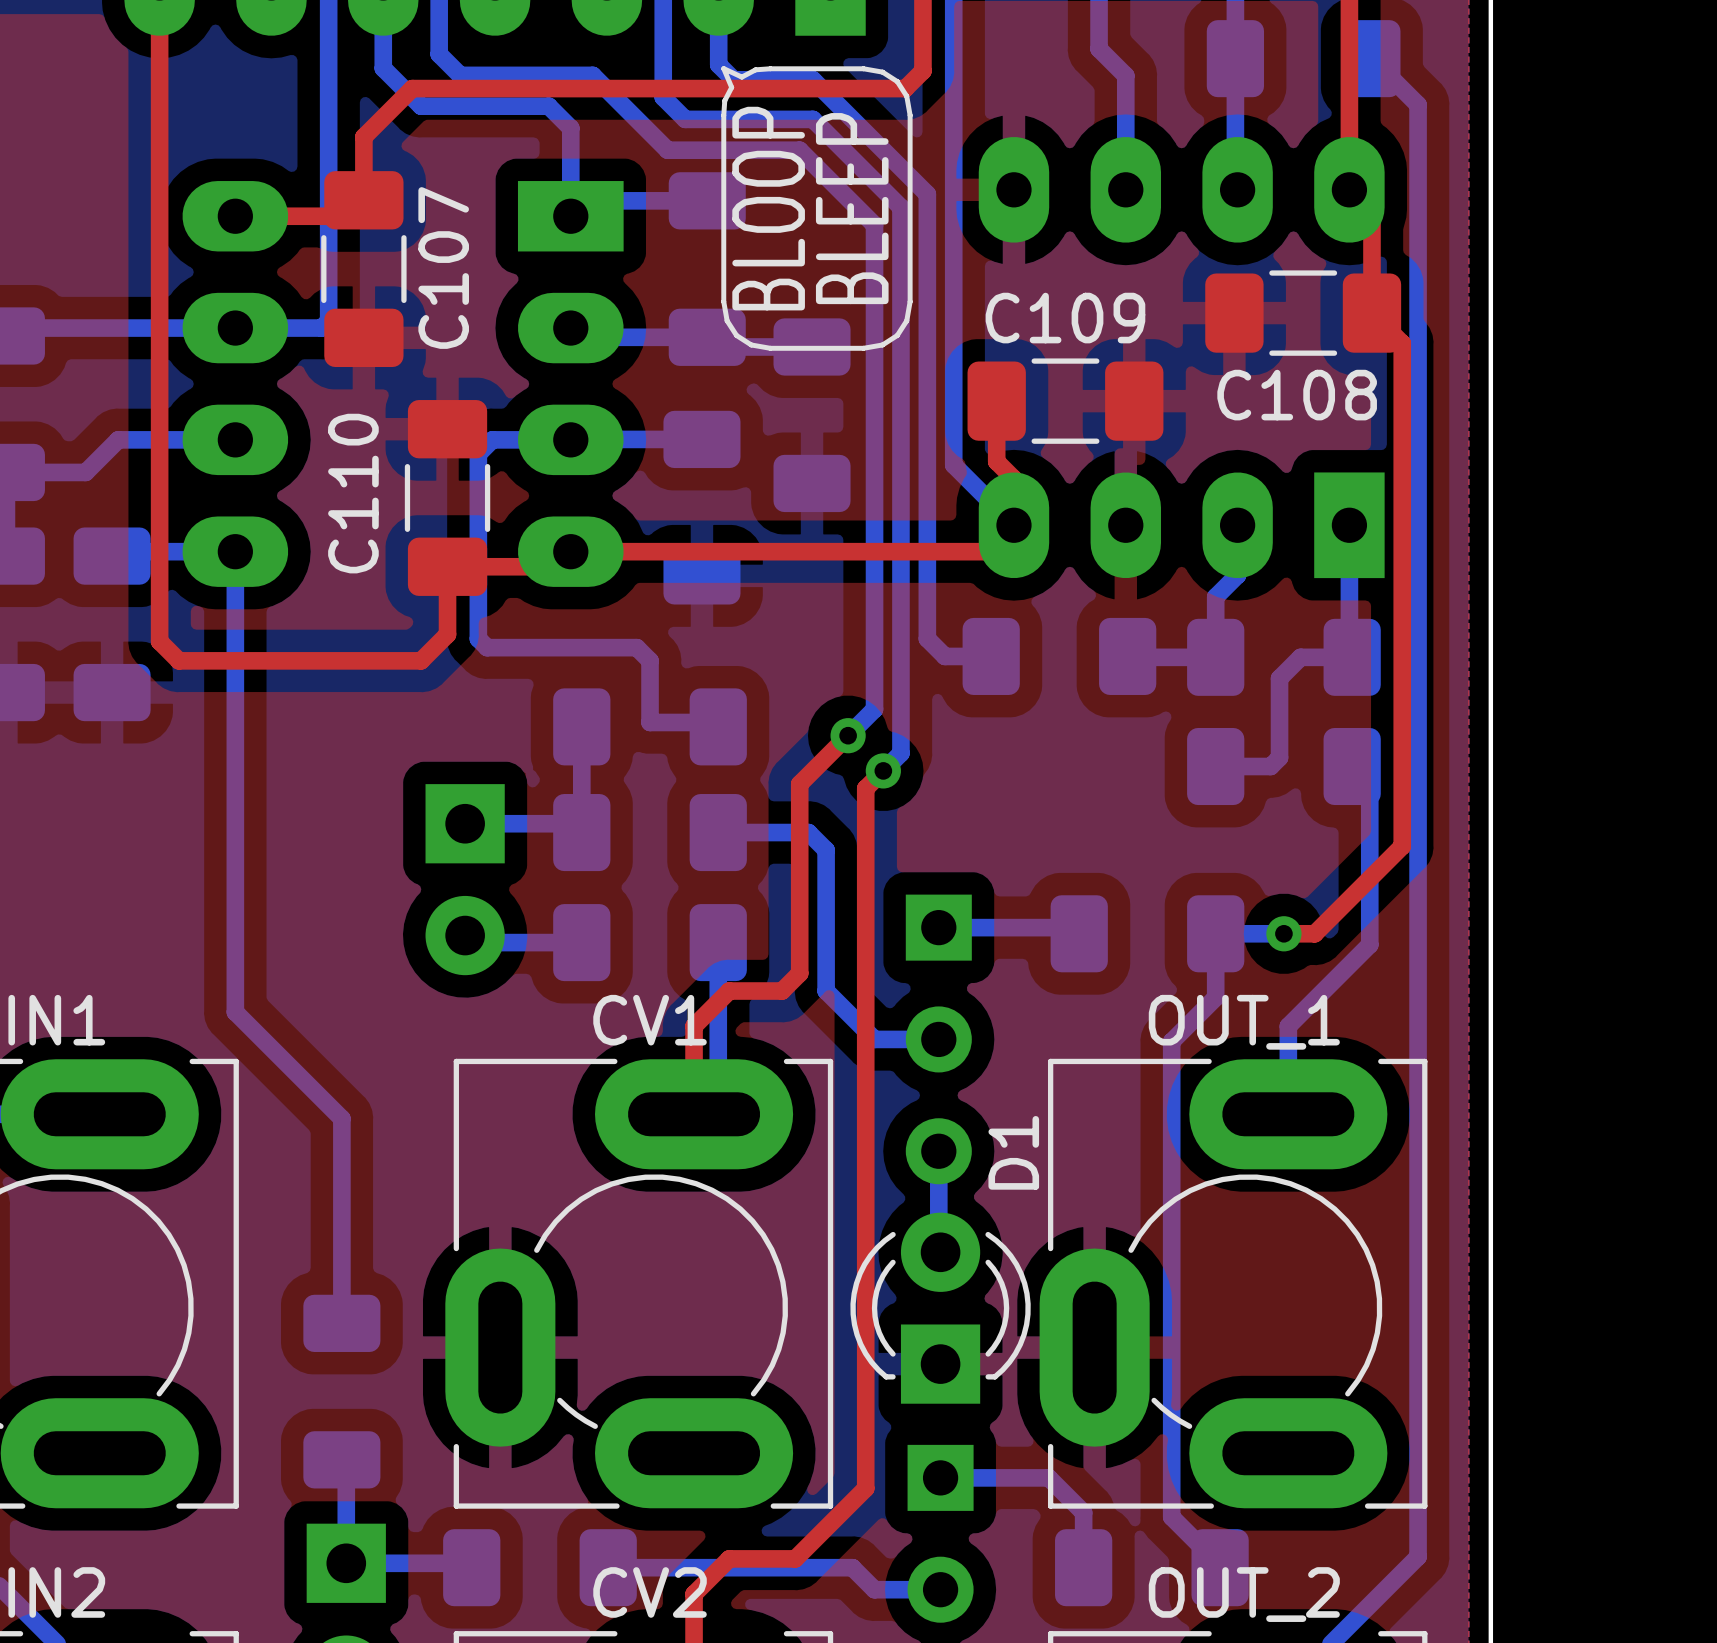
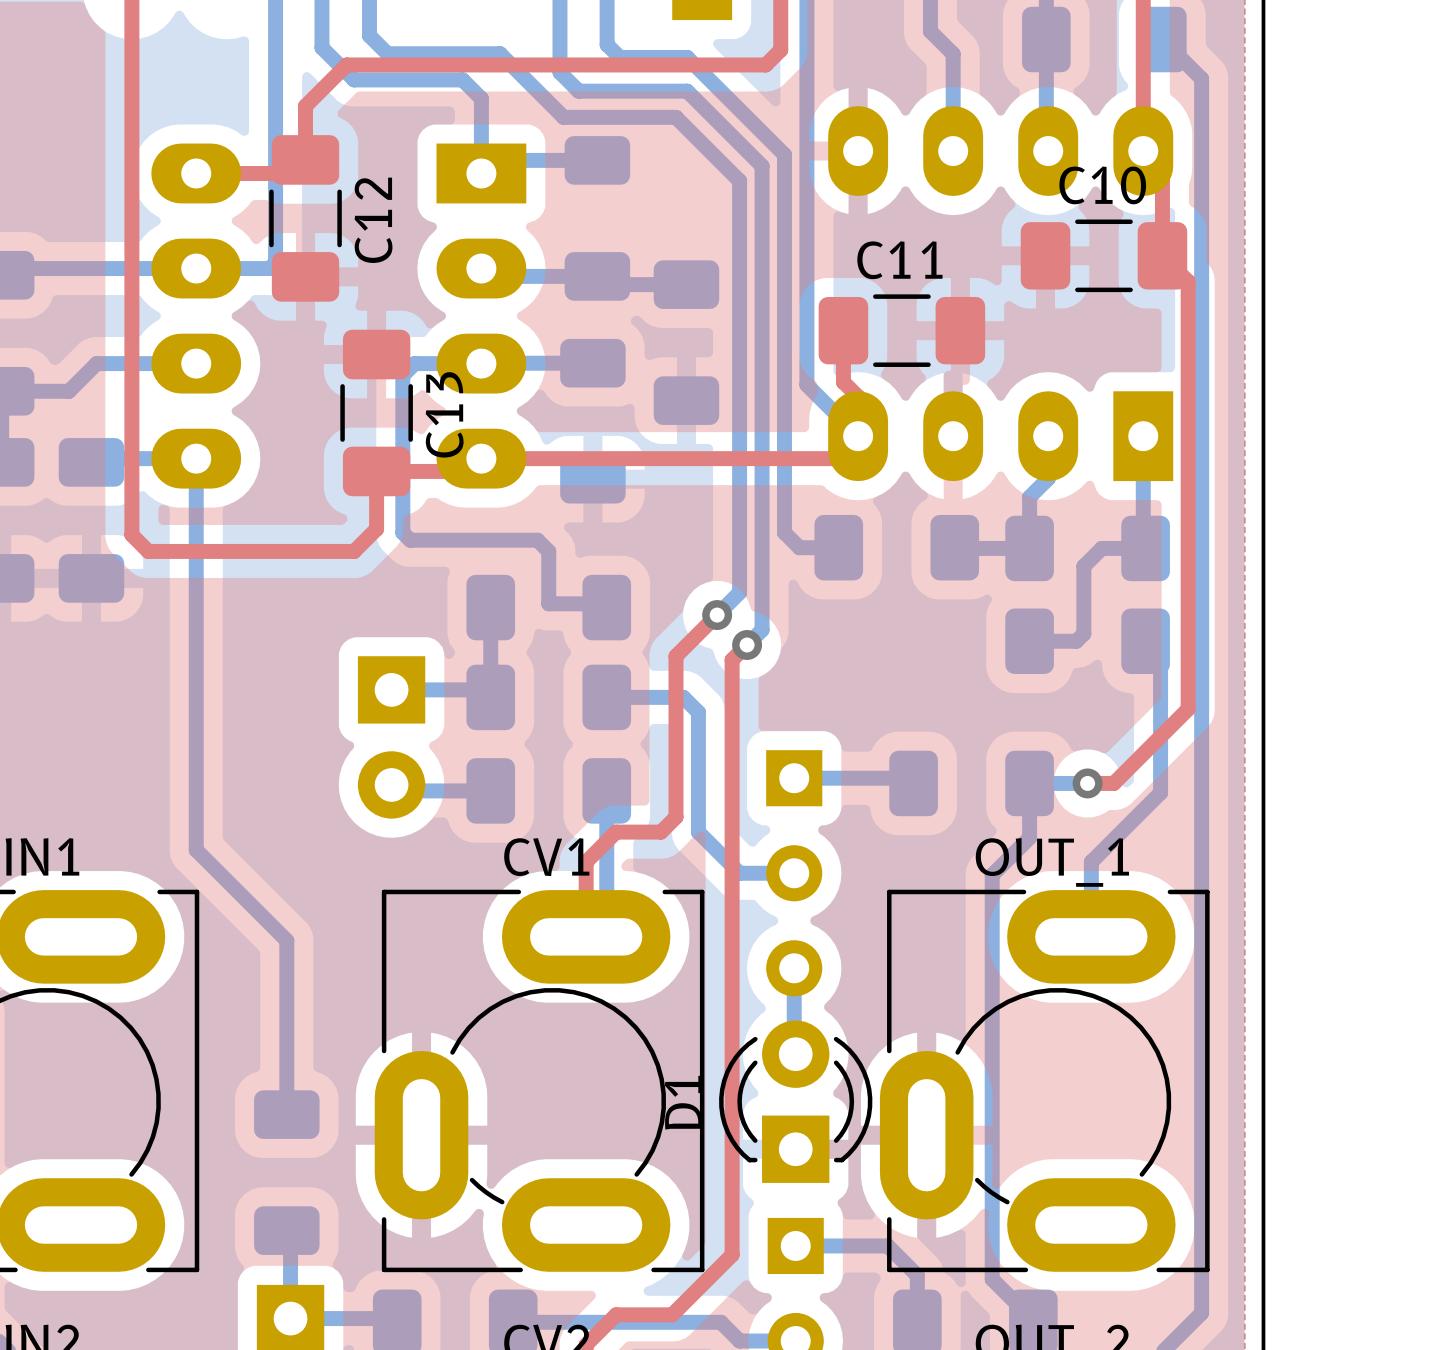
drawing: [721, 66, 913, 351] -> none
C107 name: C107 (443, 268) -> C12 (373, 220)
C109 name: C109 (1065, 318) -> C11 (899, 260)
C108 name: C108 (1297, 395) -> C10 (1102, 185)
C110 name: C110 (353, 493) -> C13 (444, 414)
D1 name position: D1 (1013, 1152) -> D1 (683, 1102)

